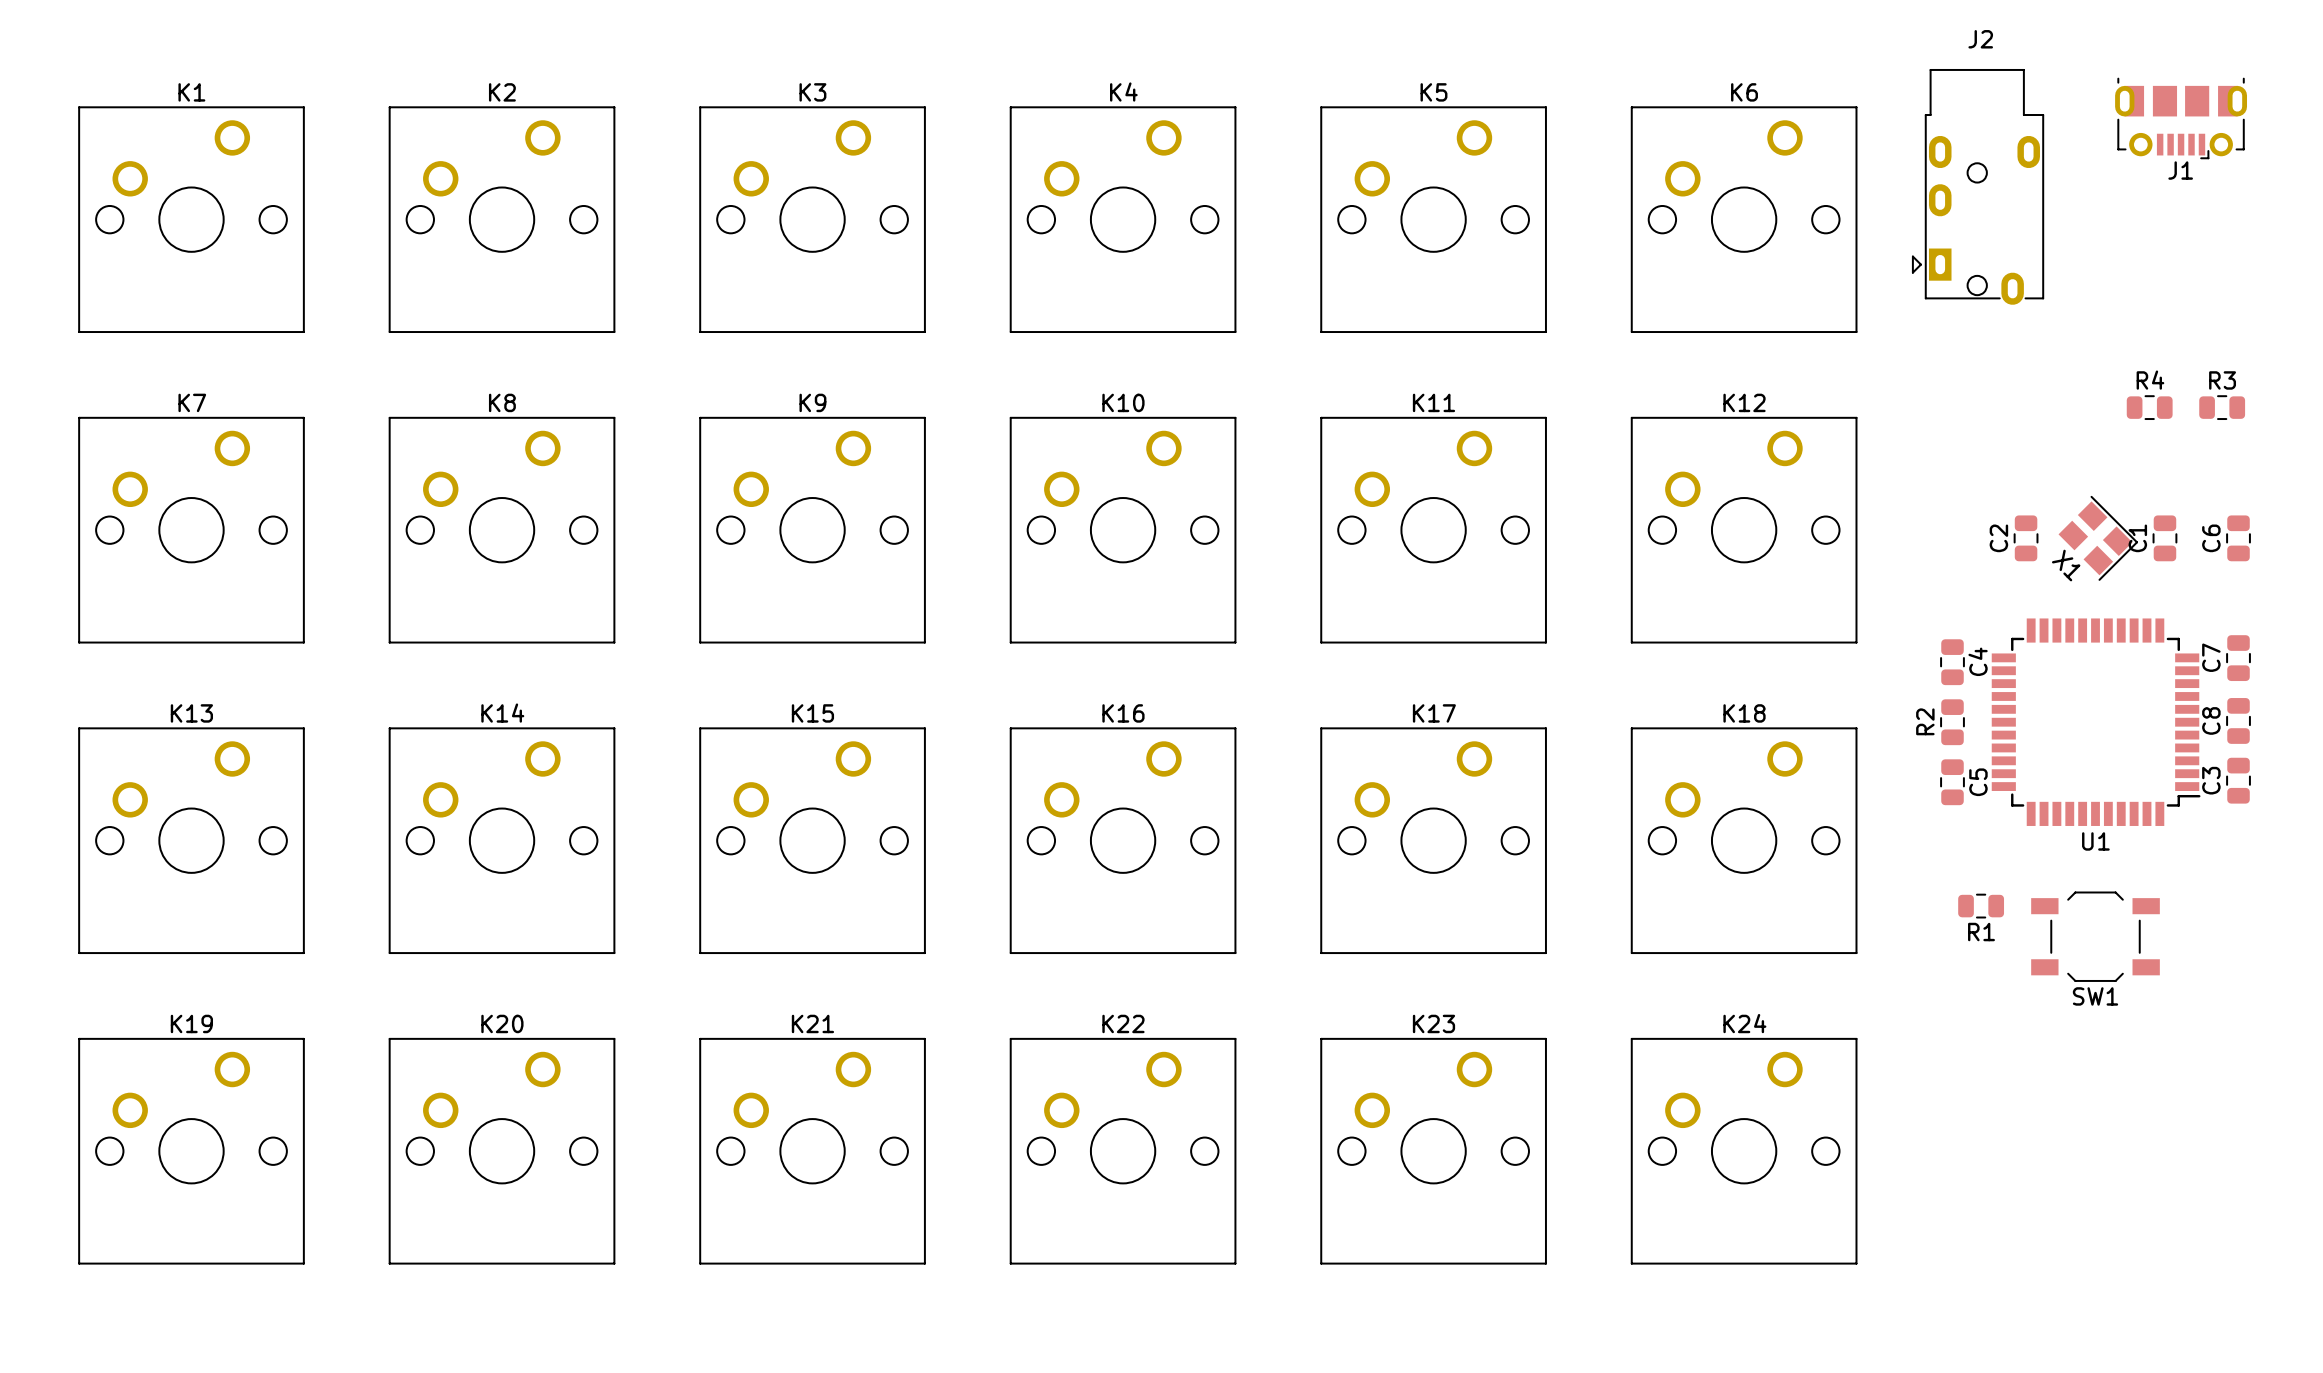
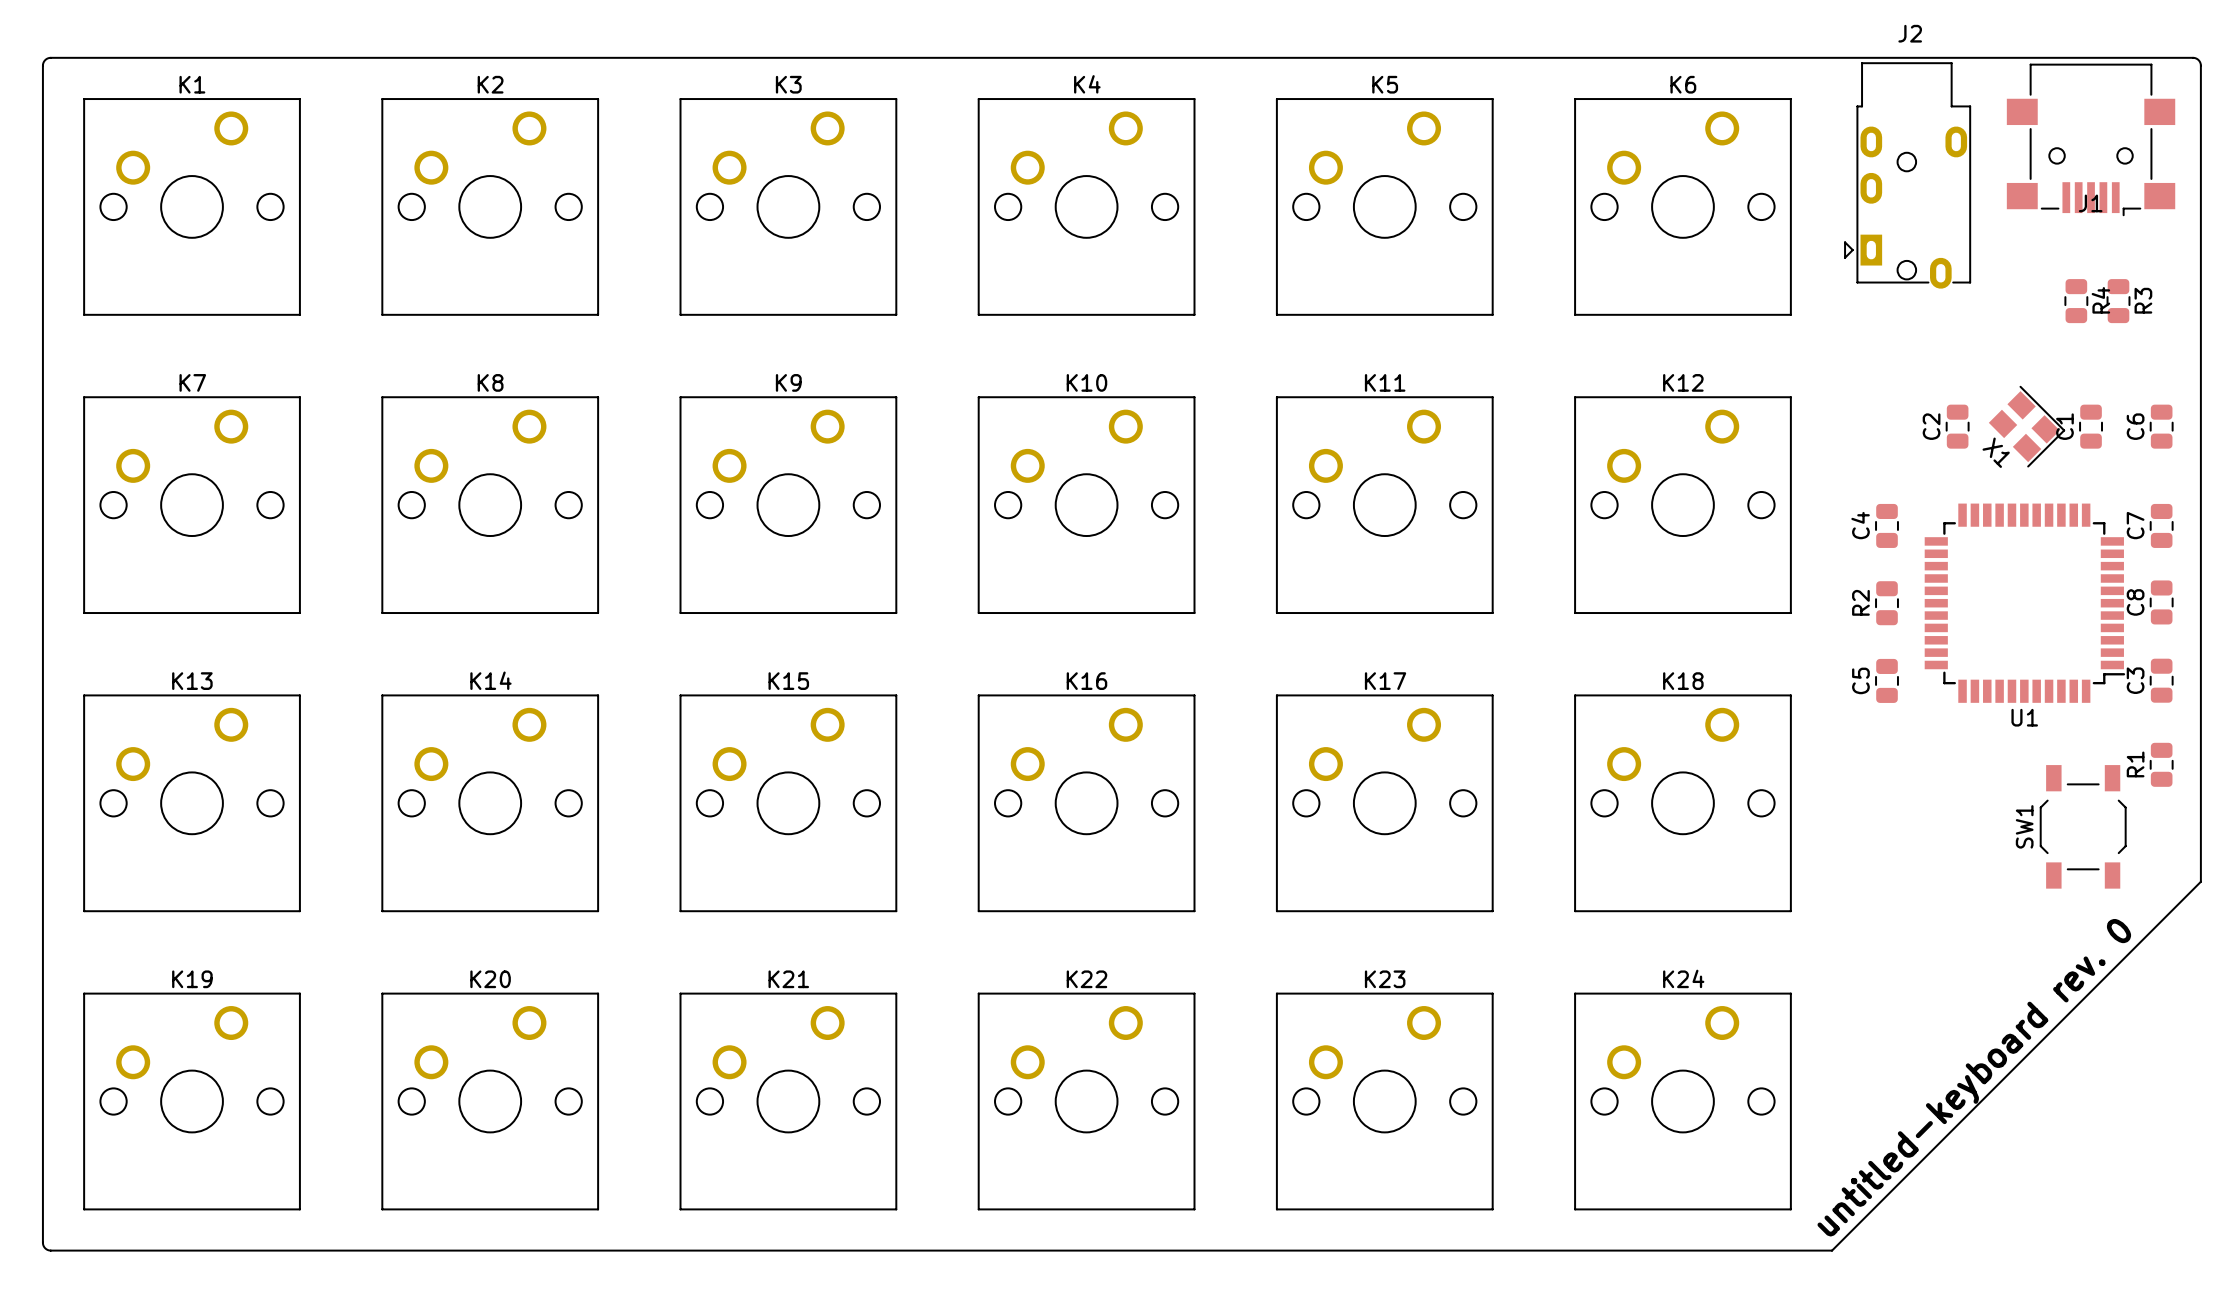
board edge: none -> (50, 57) (2196, 58) (2200, 65) (2200, 881) (1832, 1250) (47, 1250) (42, 1242) (42, 65) (45, 60) (50, 57)
J1 footprint: [2115, 77, 2248, 160] -> [2006, 63, 2176, 217]
R4 rotation: 0° (2149, 407) -> 90° clockwise (2076, 301)
R4 position: (2149, 407) -> (2076, 301)
R3 rotation: 0° (2222, 407) -> 90° clockwise (2118, 301)
R3 position: (2222, 407) -> (2118, 301)
C2 position: (2026, 538) -> (1957, 426)
X1 position: (2098, 538) -> (2026, 426)
C1 position: (2164, 538) -> (2091, 426)
C6 position: (2238, 538) -> (2161, 426)
C7 position: (2238, 658) -> (2161, 525)
C4 name position: C4 (1978, 661) -> C4 (1860, 525)
C4 position: (1952, 662) -> (1887, 525)
C8 position: (2238, 720) -> (2161, 602)
R2 position: (1952, 722) -> (1887, 603)
U1 position: (2096, 722) -> (2024, 603)
C3 position: (2238, 780) -> (2161, 680)
C5 position: (1952, 782) -> (1887, 680)
C5 name position: C5 (1978, 782) -> C5 (1860, 680)
R1 rotation: 0° (1981, 906) -> 90° clockwise (2161, 764)
R1 position: (1981, 906) -> (2161, 764)
SW1 rotation: 0° (2095, 936) -> 90° clockwise (2083, 826)
SW1 position: (2095, 936) -> (2083, 826)
text: none -> untitled-keyboard rev. 0 (1974, 1077)

